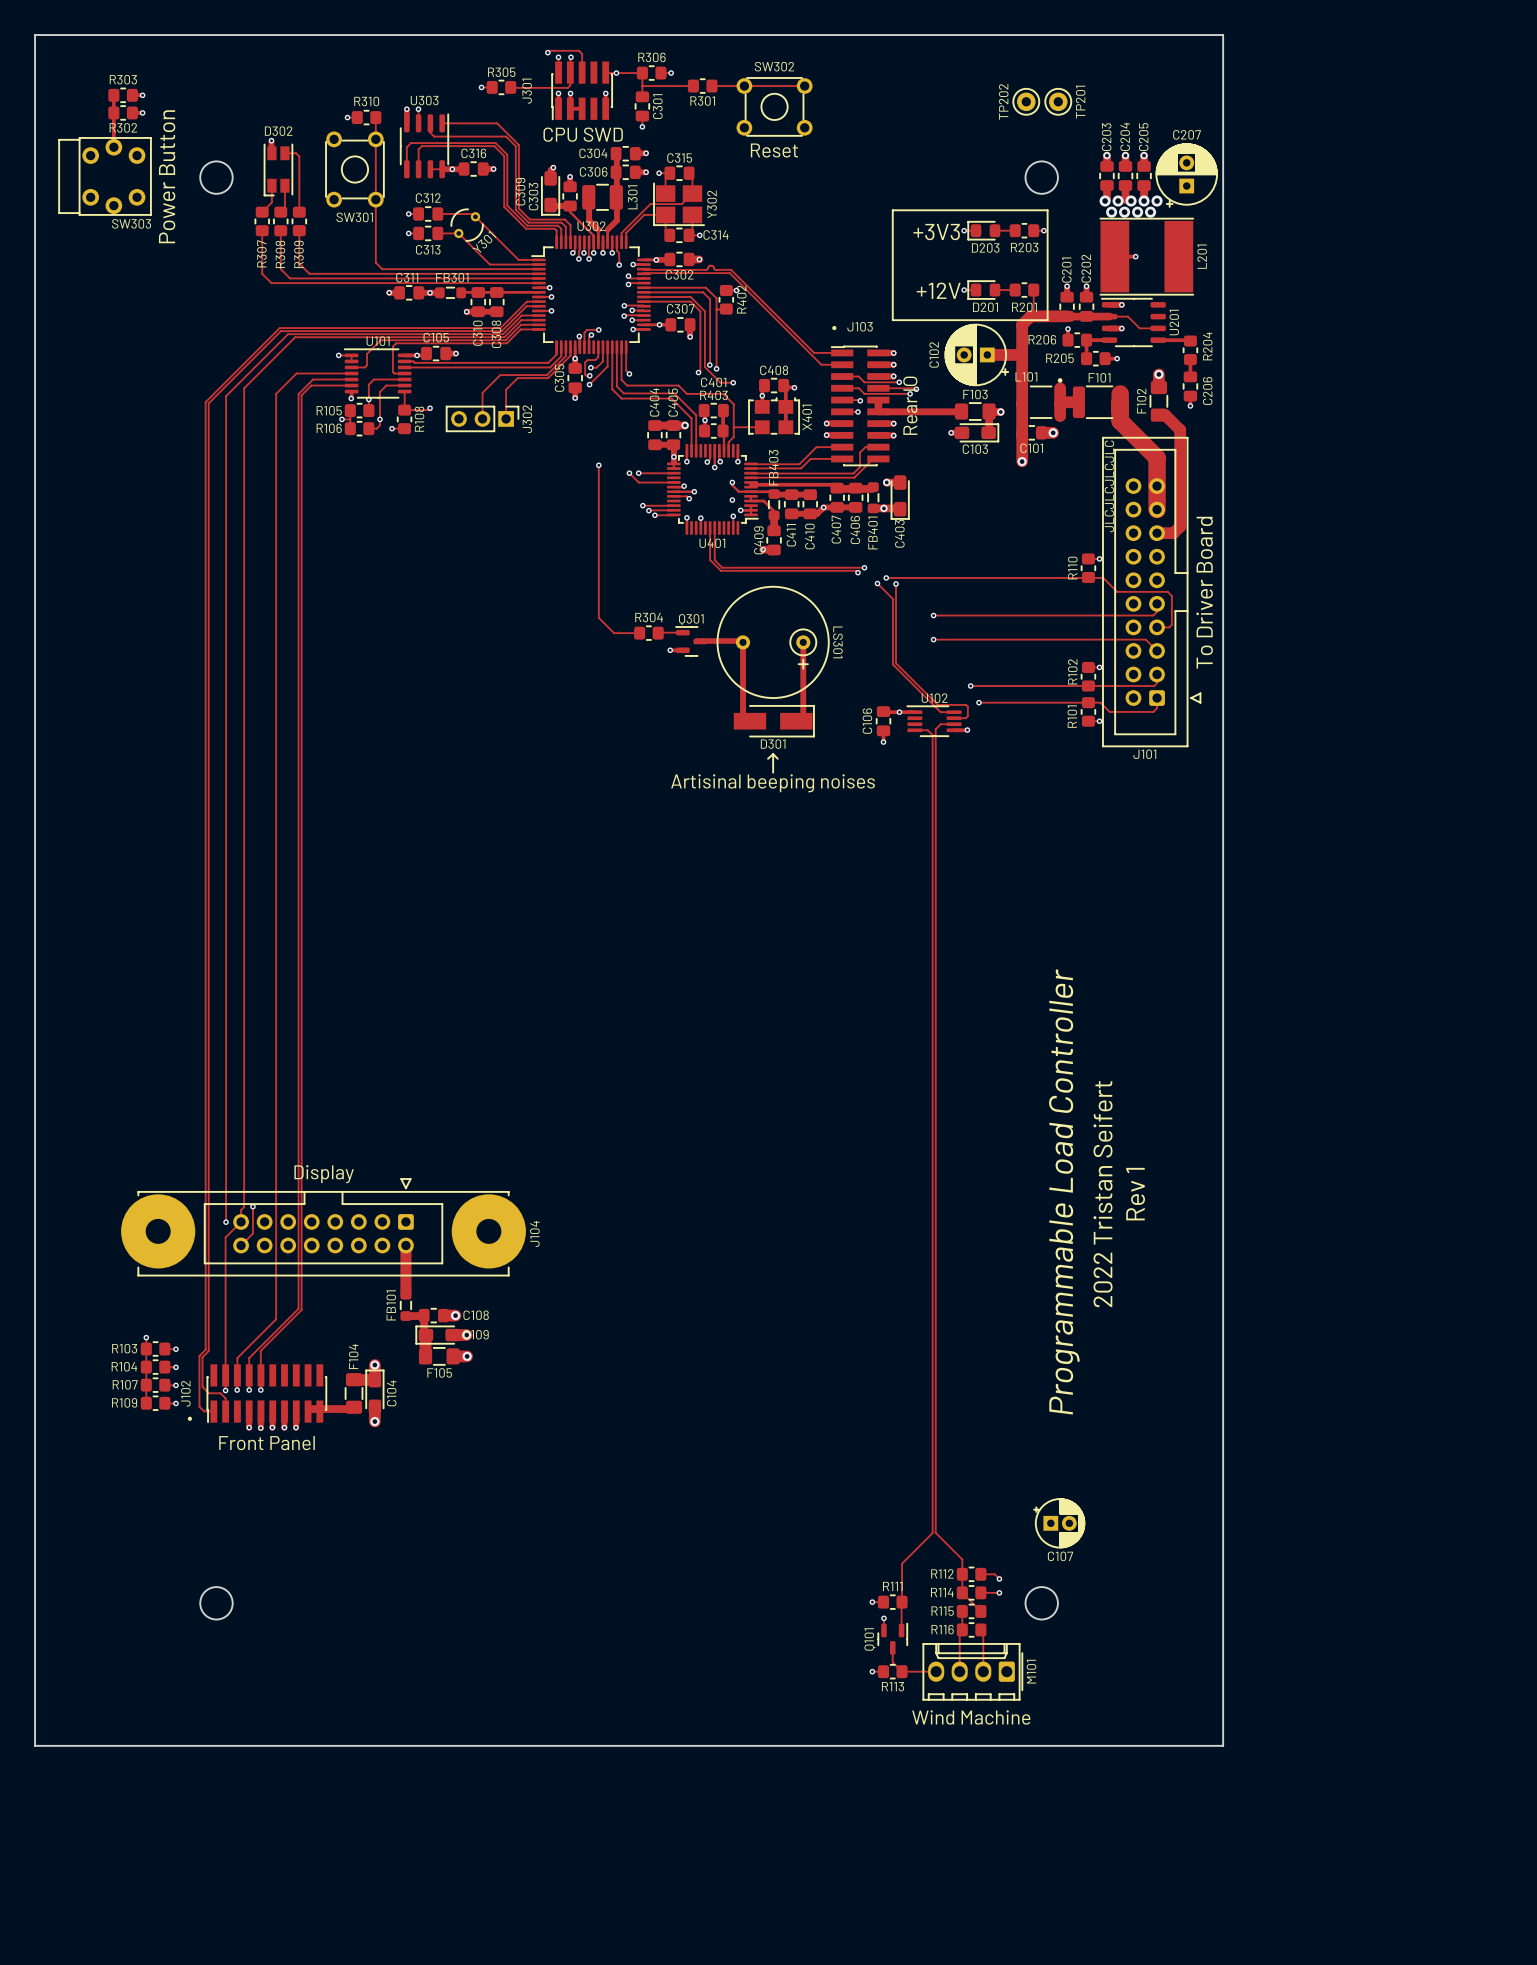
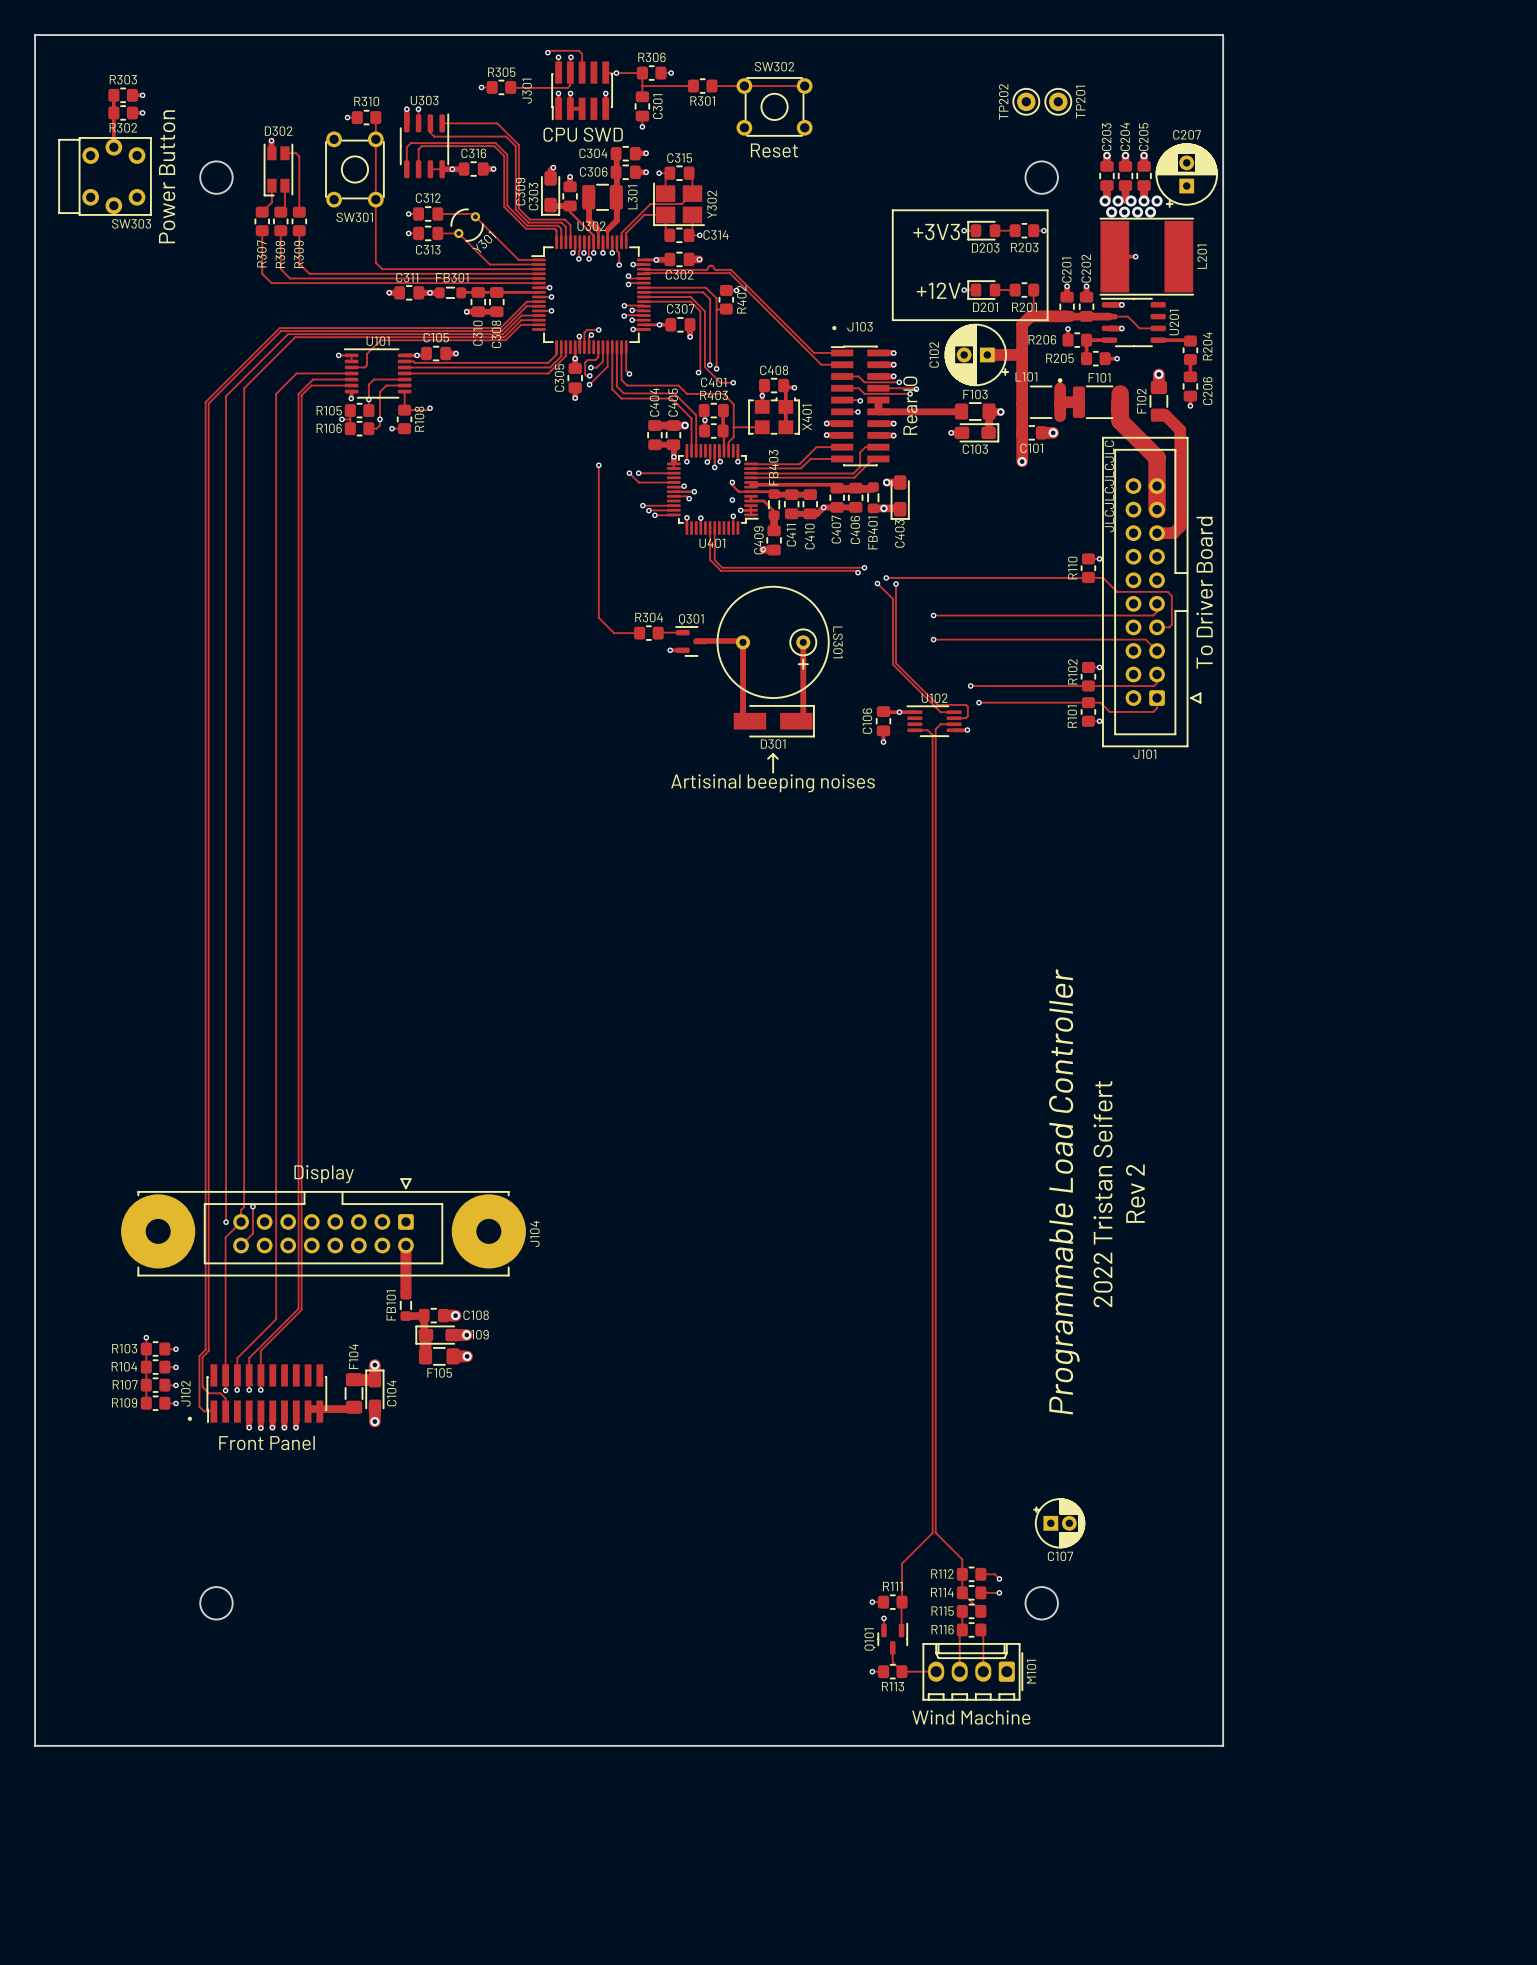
track: (538, 329) (520, 329) (506, 343) (396, 343) (392, 346) (392, 372) (404, 373) -> (548, 373) (404, 373)
track: (570, 347) (570, 355) (548, 378) (517, 378) (506, 389) (506, 418) -> none
track: (548, 373) (546, 375) (500, 375) (482, 392) (482, 418) -> none
J302: (482, 418) -> none
text: Rev 1 (1135, 1194) -> Rev 2 (1135, 1193)

